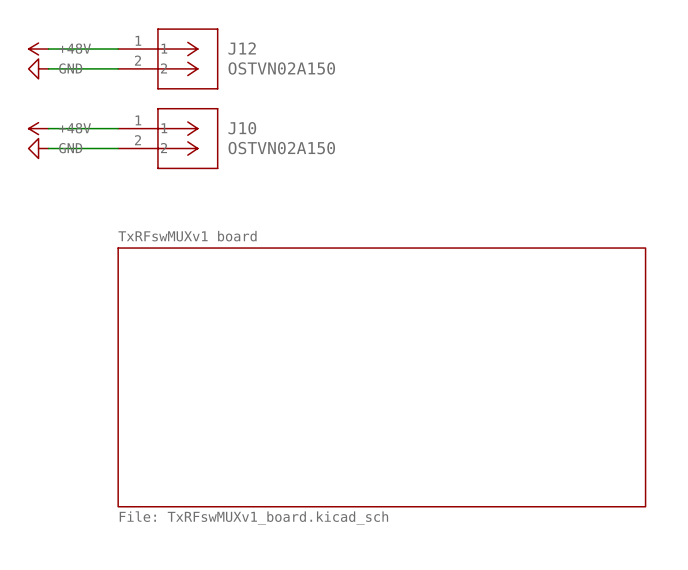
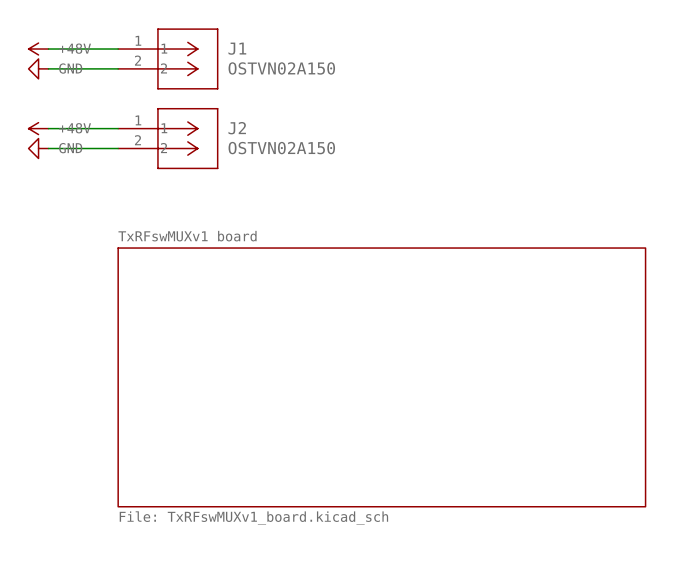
J12 name: J12 (242, 48) -> J1 (237, 48)
J10 name: J10 (242, 128) -> J2 (237, 128)

